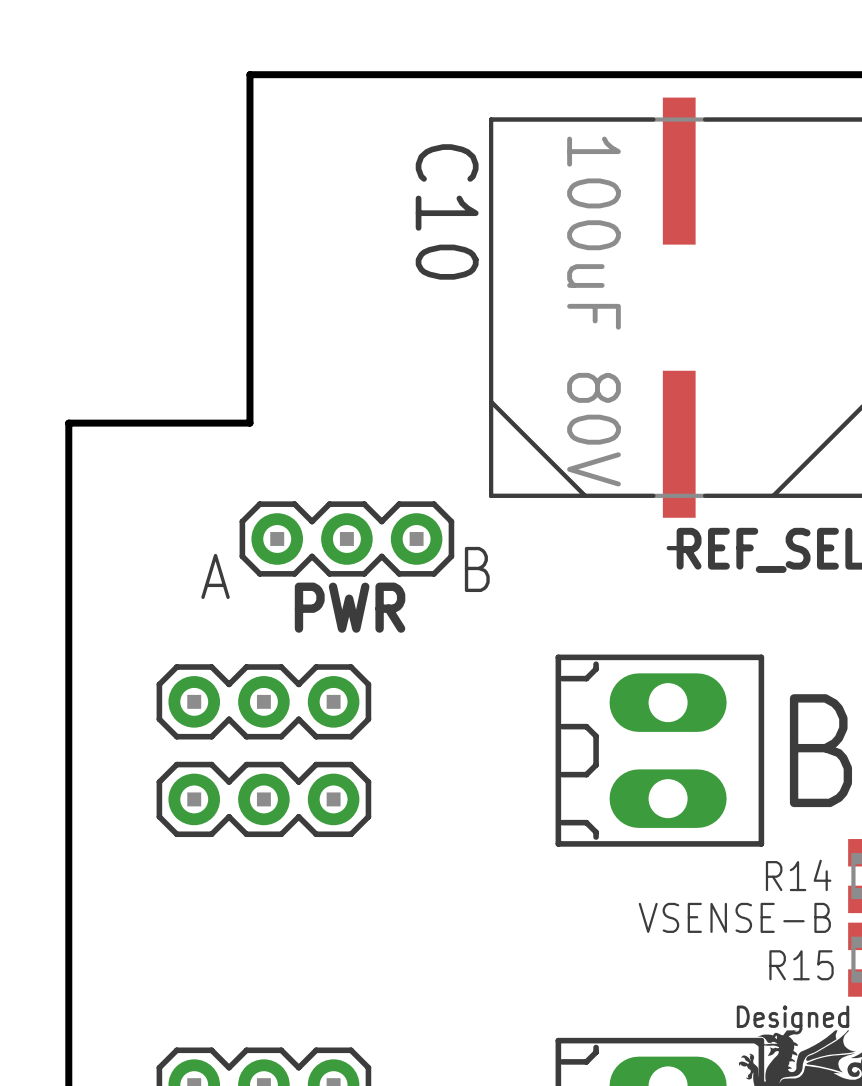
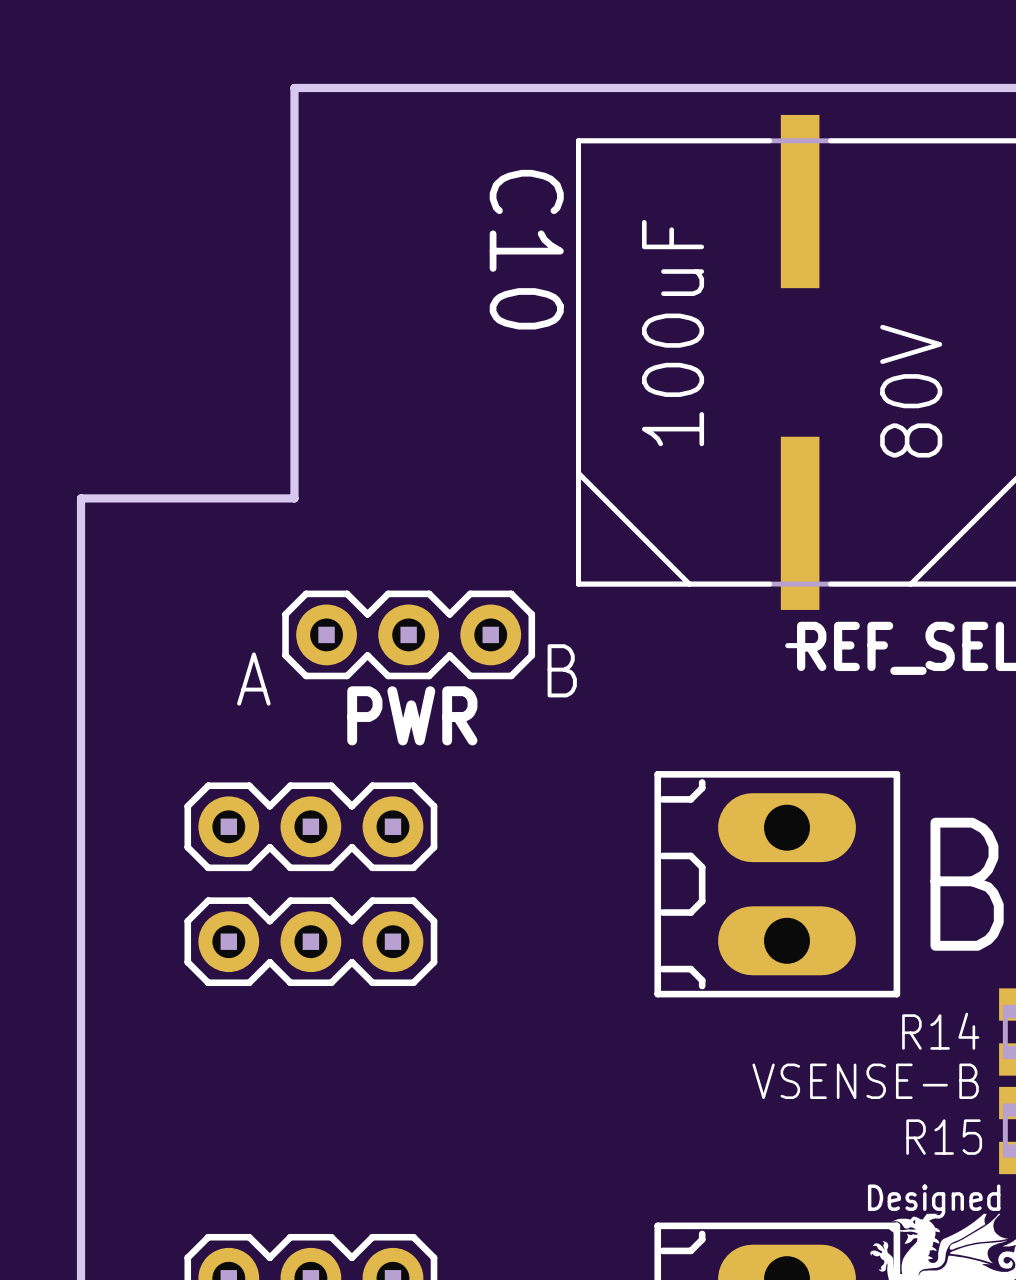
text: none -> 100uF (673, 333)
C10 value: 100uF 80V (593, 311) -> none
text: none -> 80V (911, 391)

